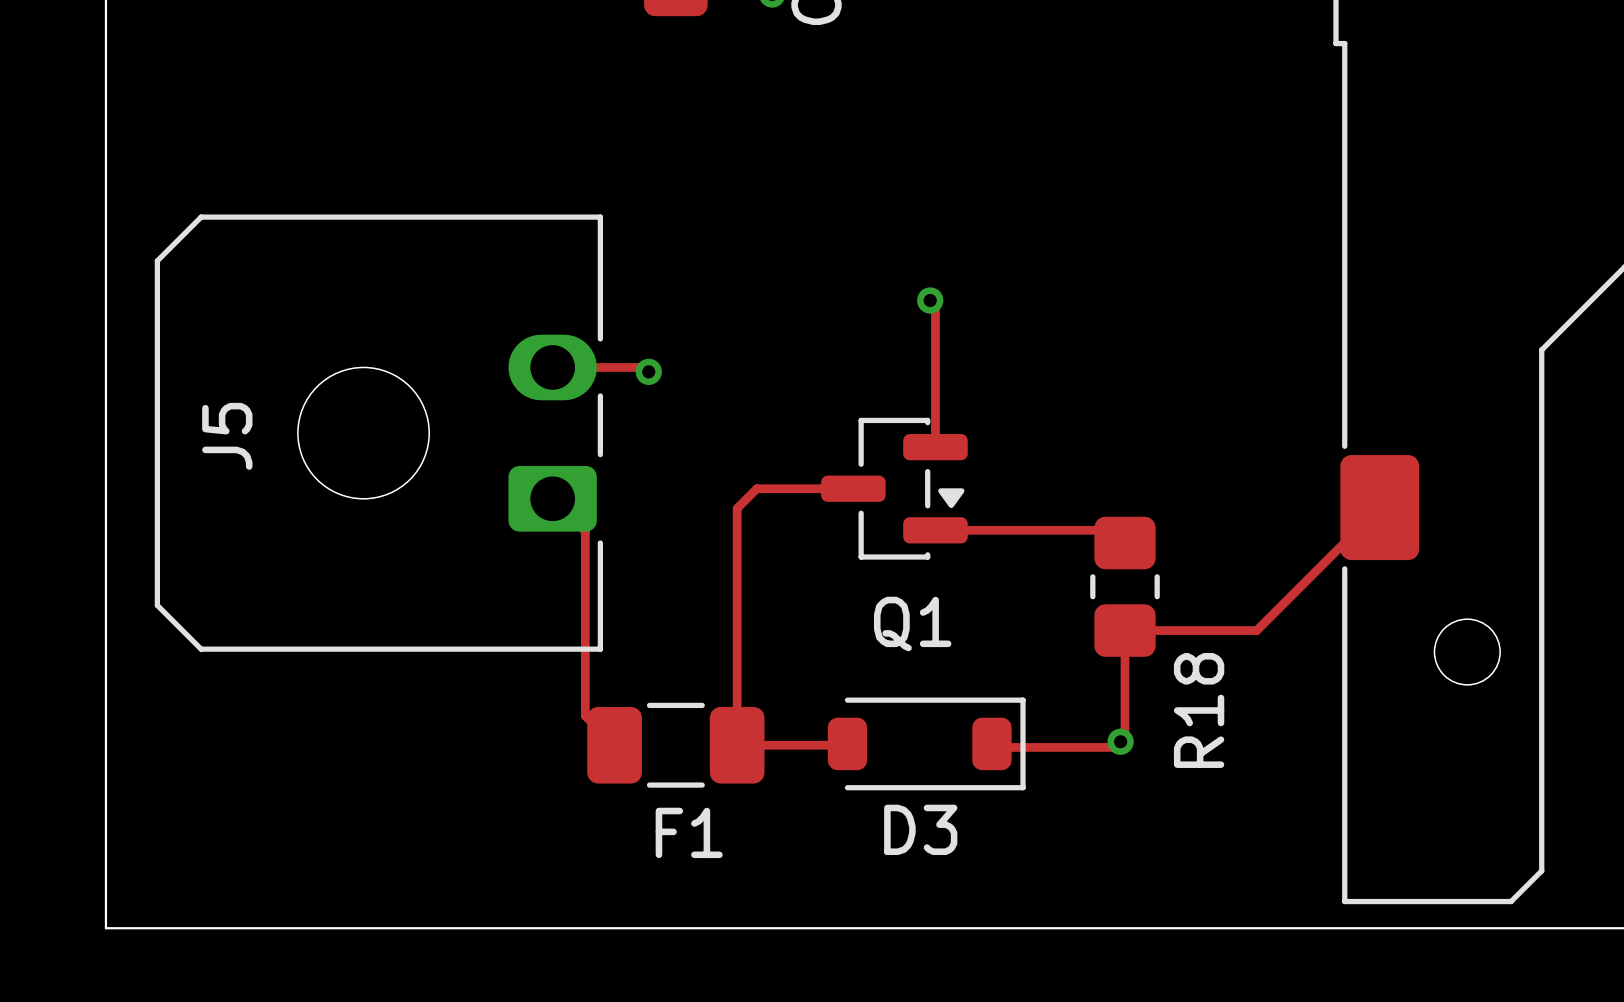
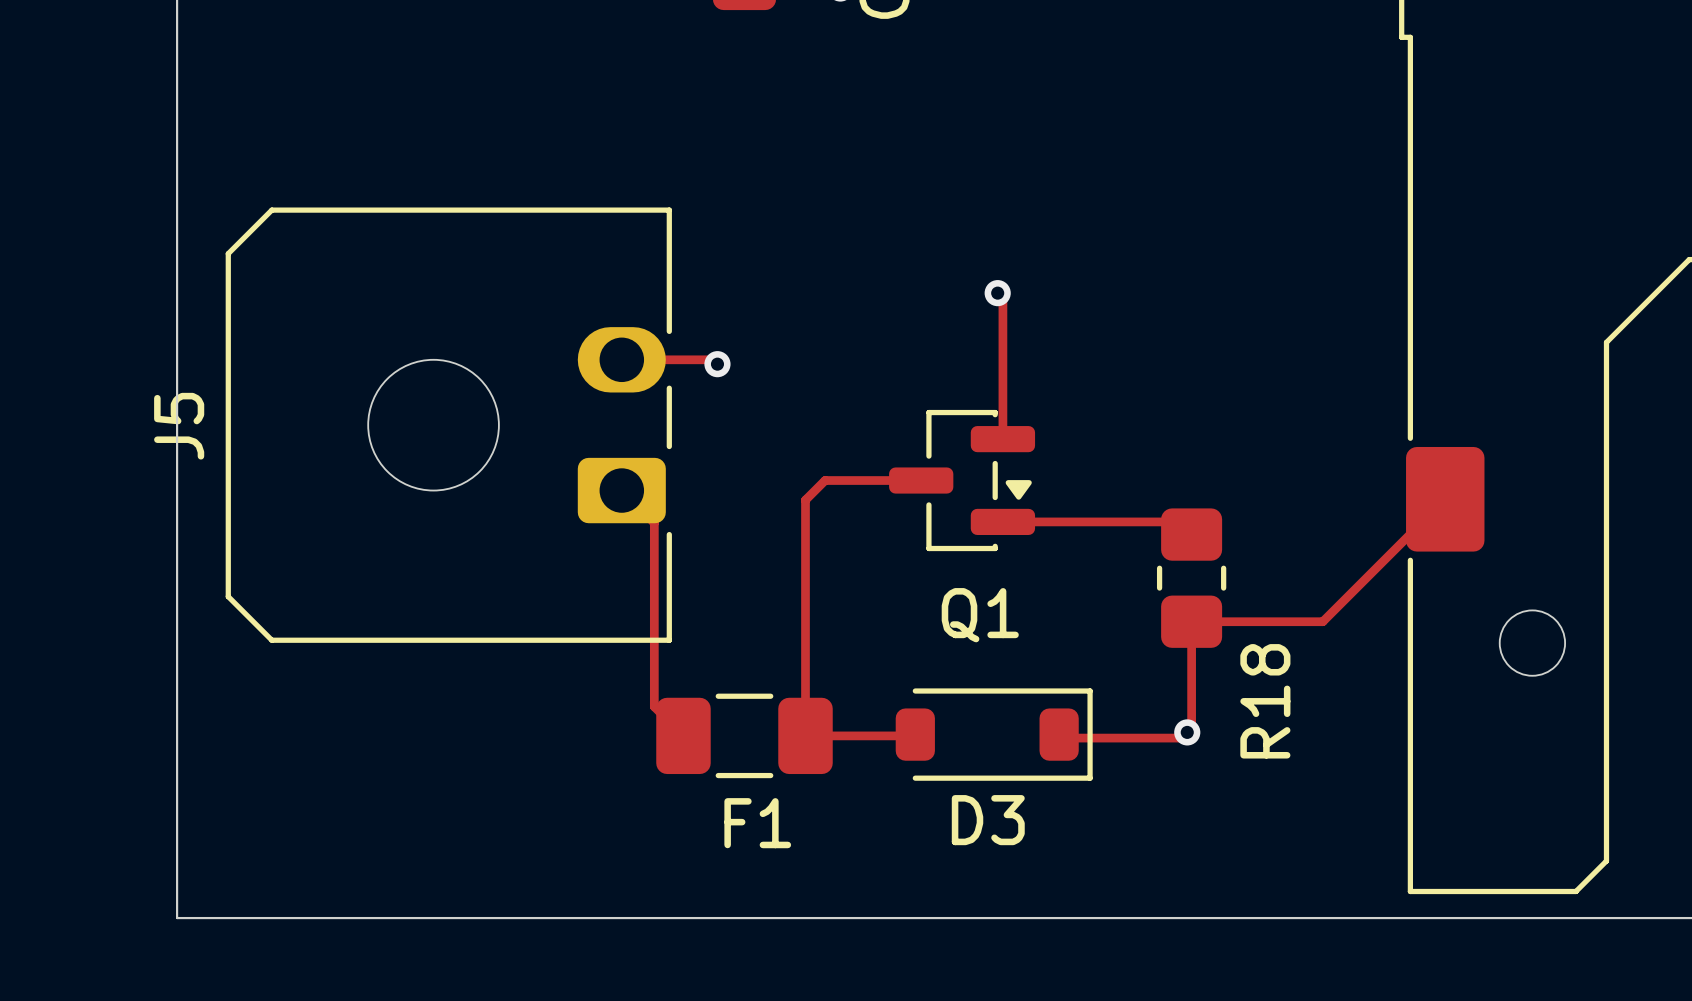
J5 name position: J5 (227, 436) -> J5 (179, 426)

